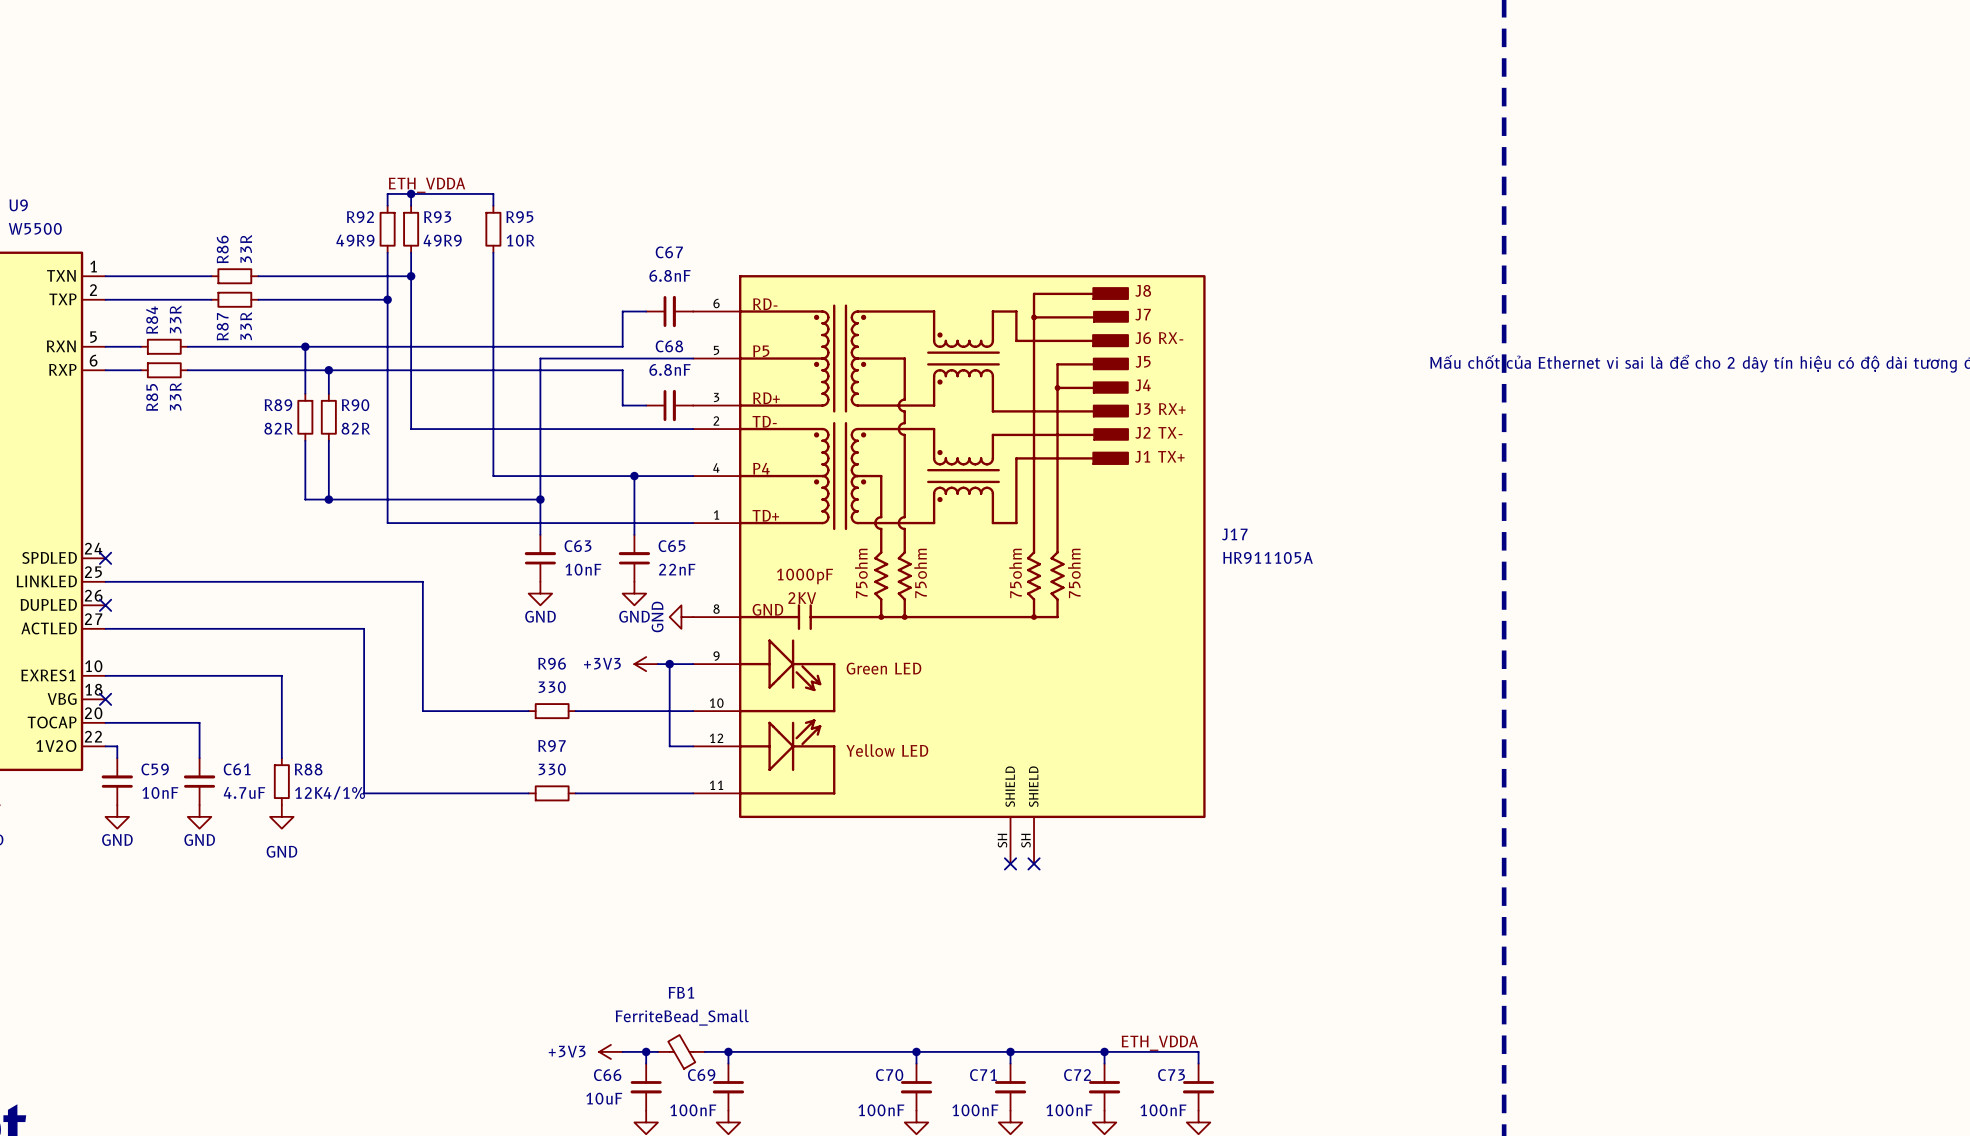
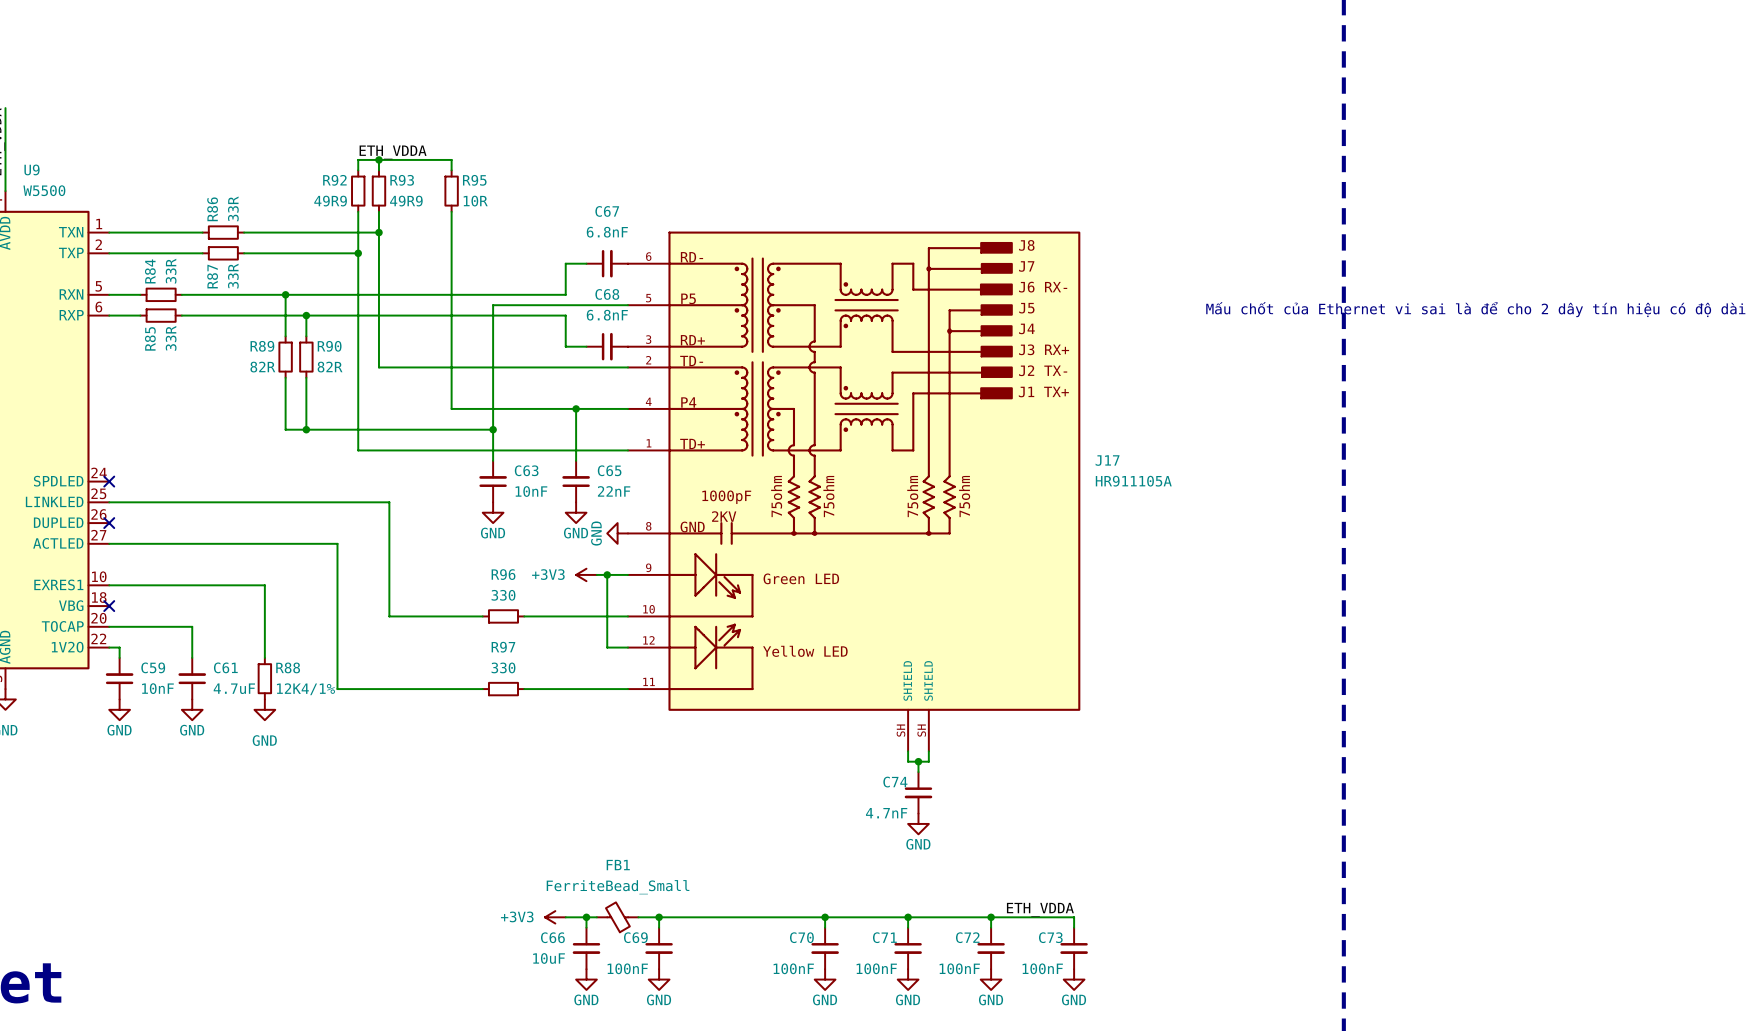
wire: none -> (908, 751) (908, 761) (928, 761) (928, 751)
no-connect mark: (1010, 863) -> none
no-connect mark: (1034, 863) -> none
wire: none -> (918, 761) (918, 772)
junction: none -> (918, 761)
C74: none -> 4.7nF (918, 792)
power symbol: none -> GND (918, 823)

